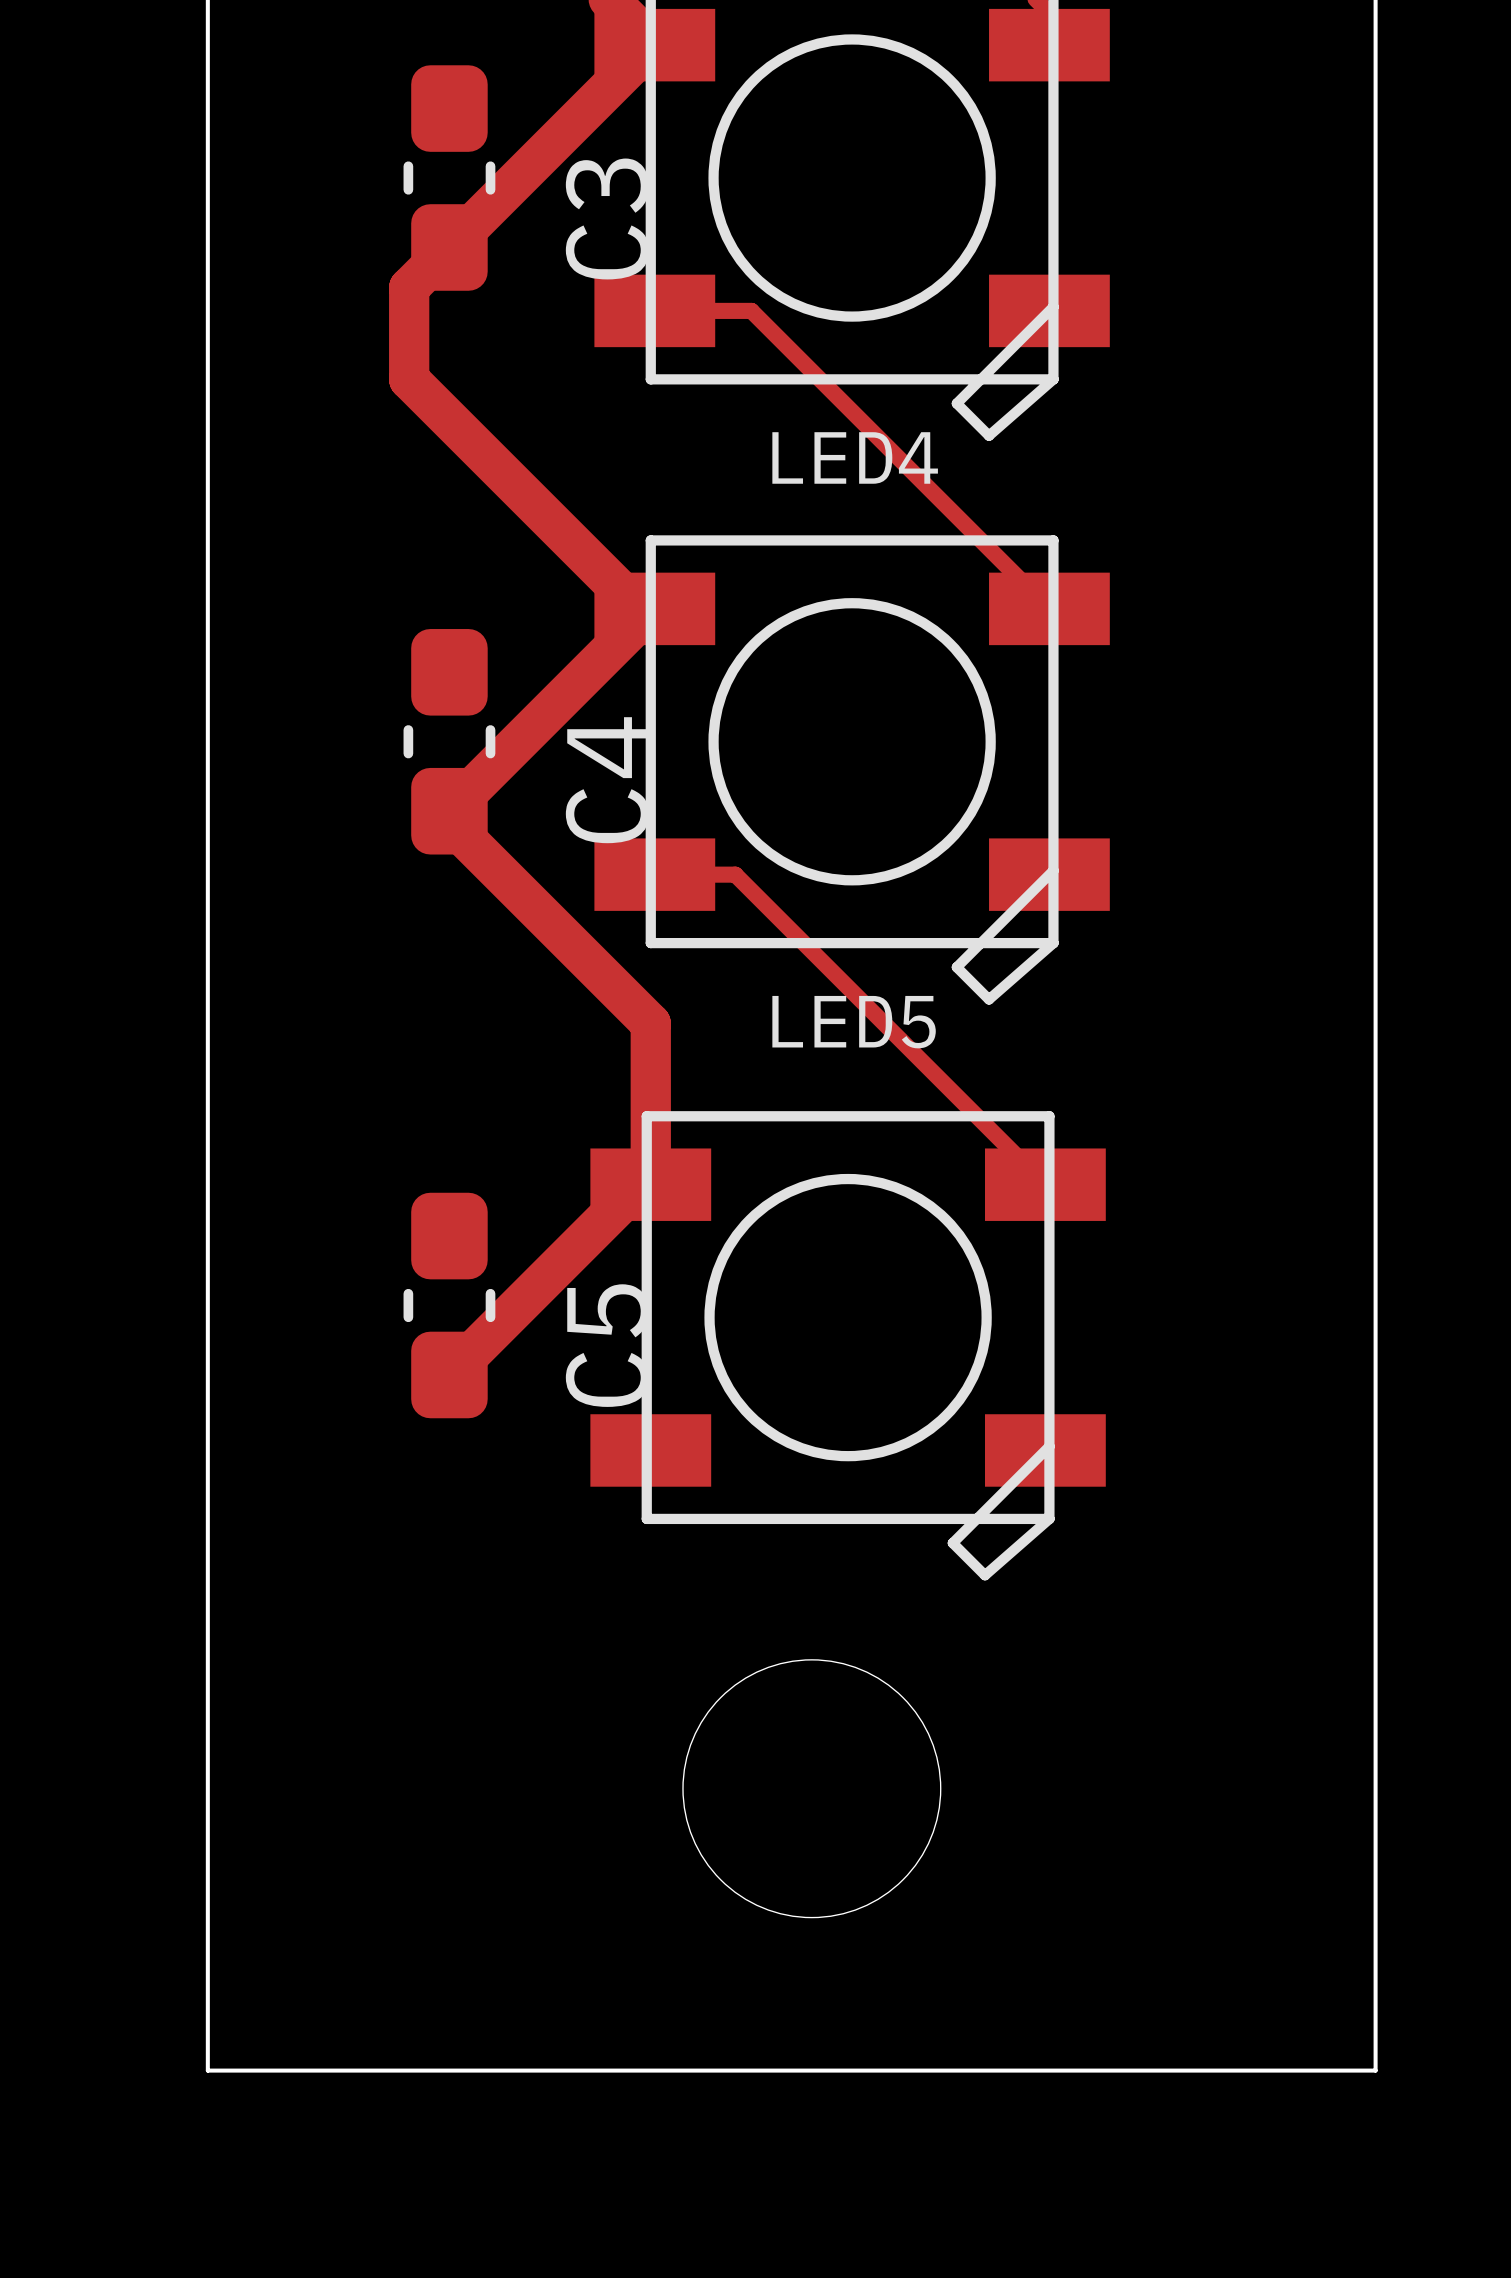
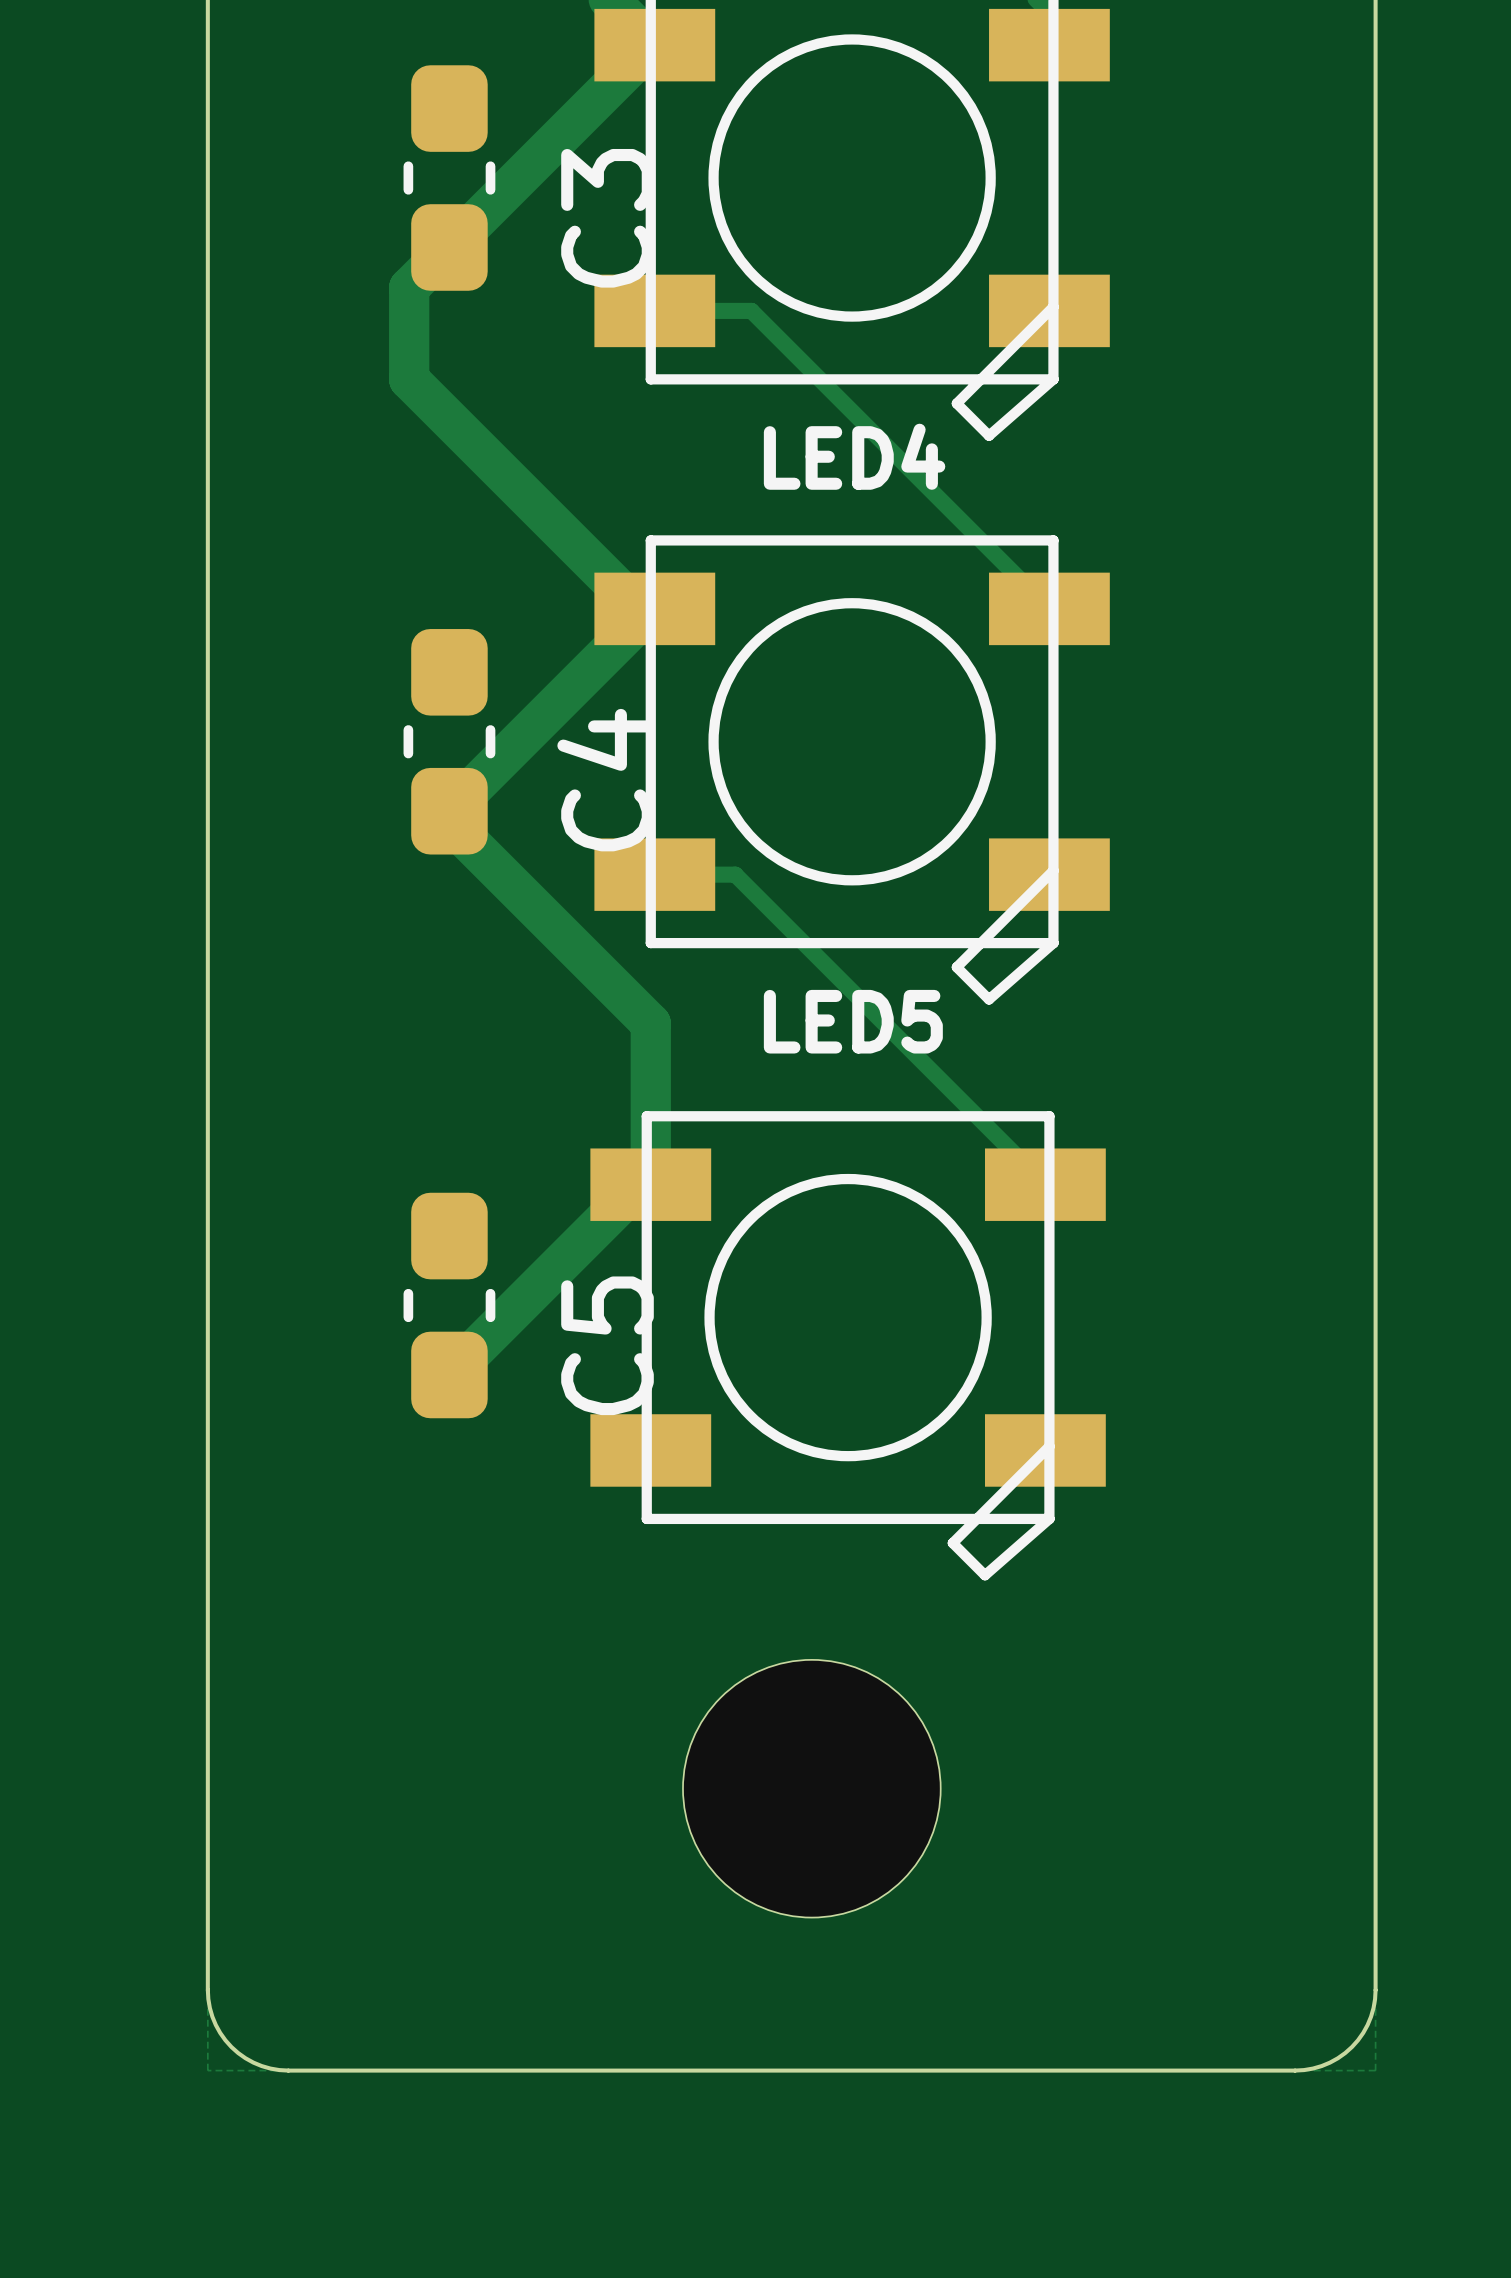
board edge: (207, 1990) (207, 2070) (288, 2070) -> (207, 1990) (209, 2007) (215, 2024) (231, 2047) (245, 2058) (261, 2066) (288, 2070)
board edge: (1375, 1990) (1375, 2070) (1295, 2070) -> (1375, 1990) (1373, 2007) (1367, 2024) (1352, 2047) (1330, 2062) (1312, 2068) (1295, 2070)

